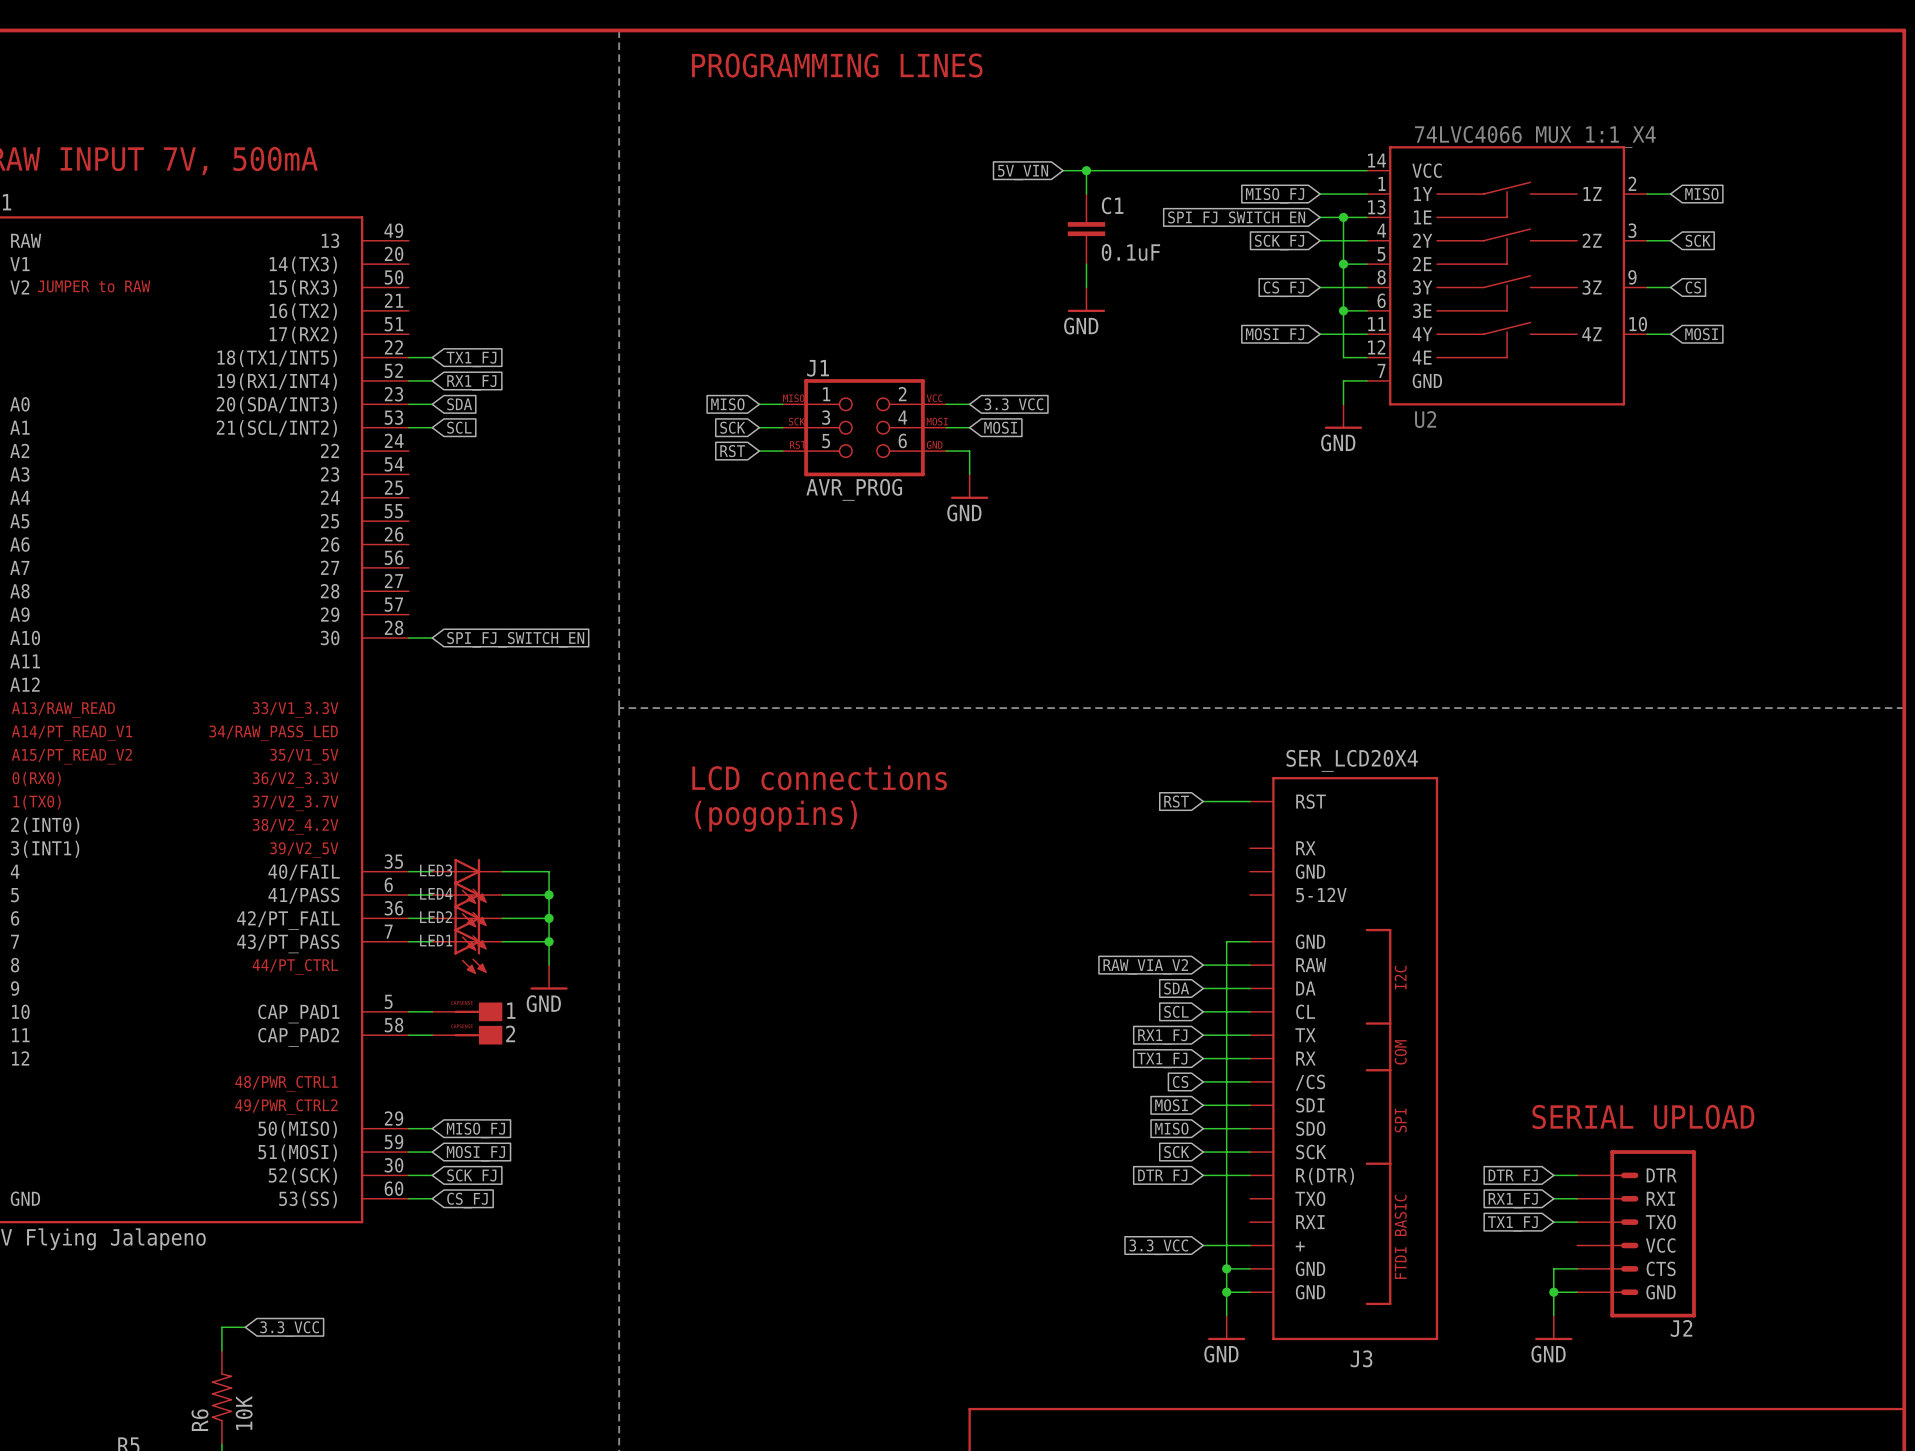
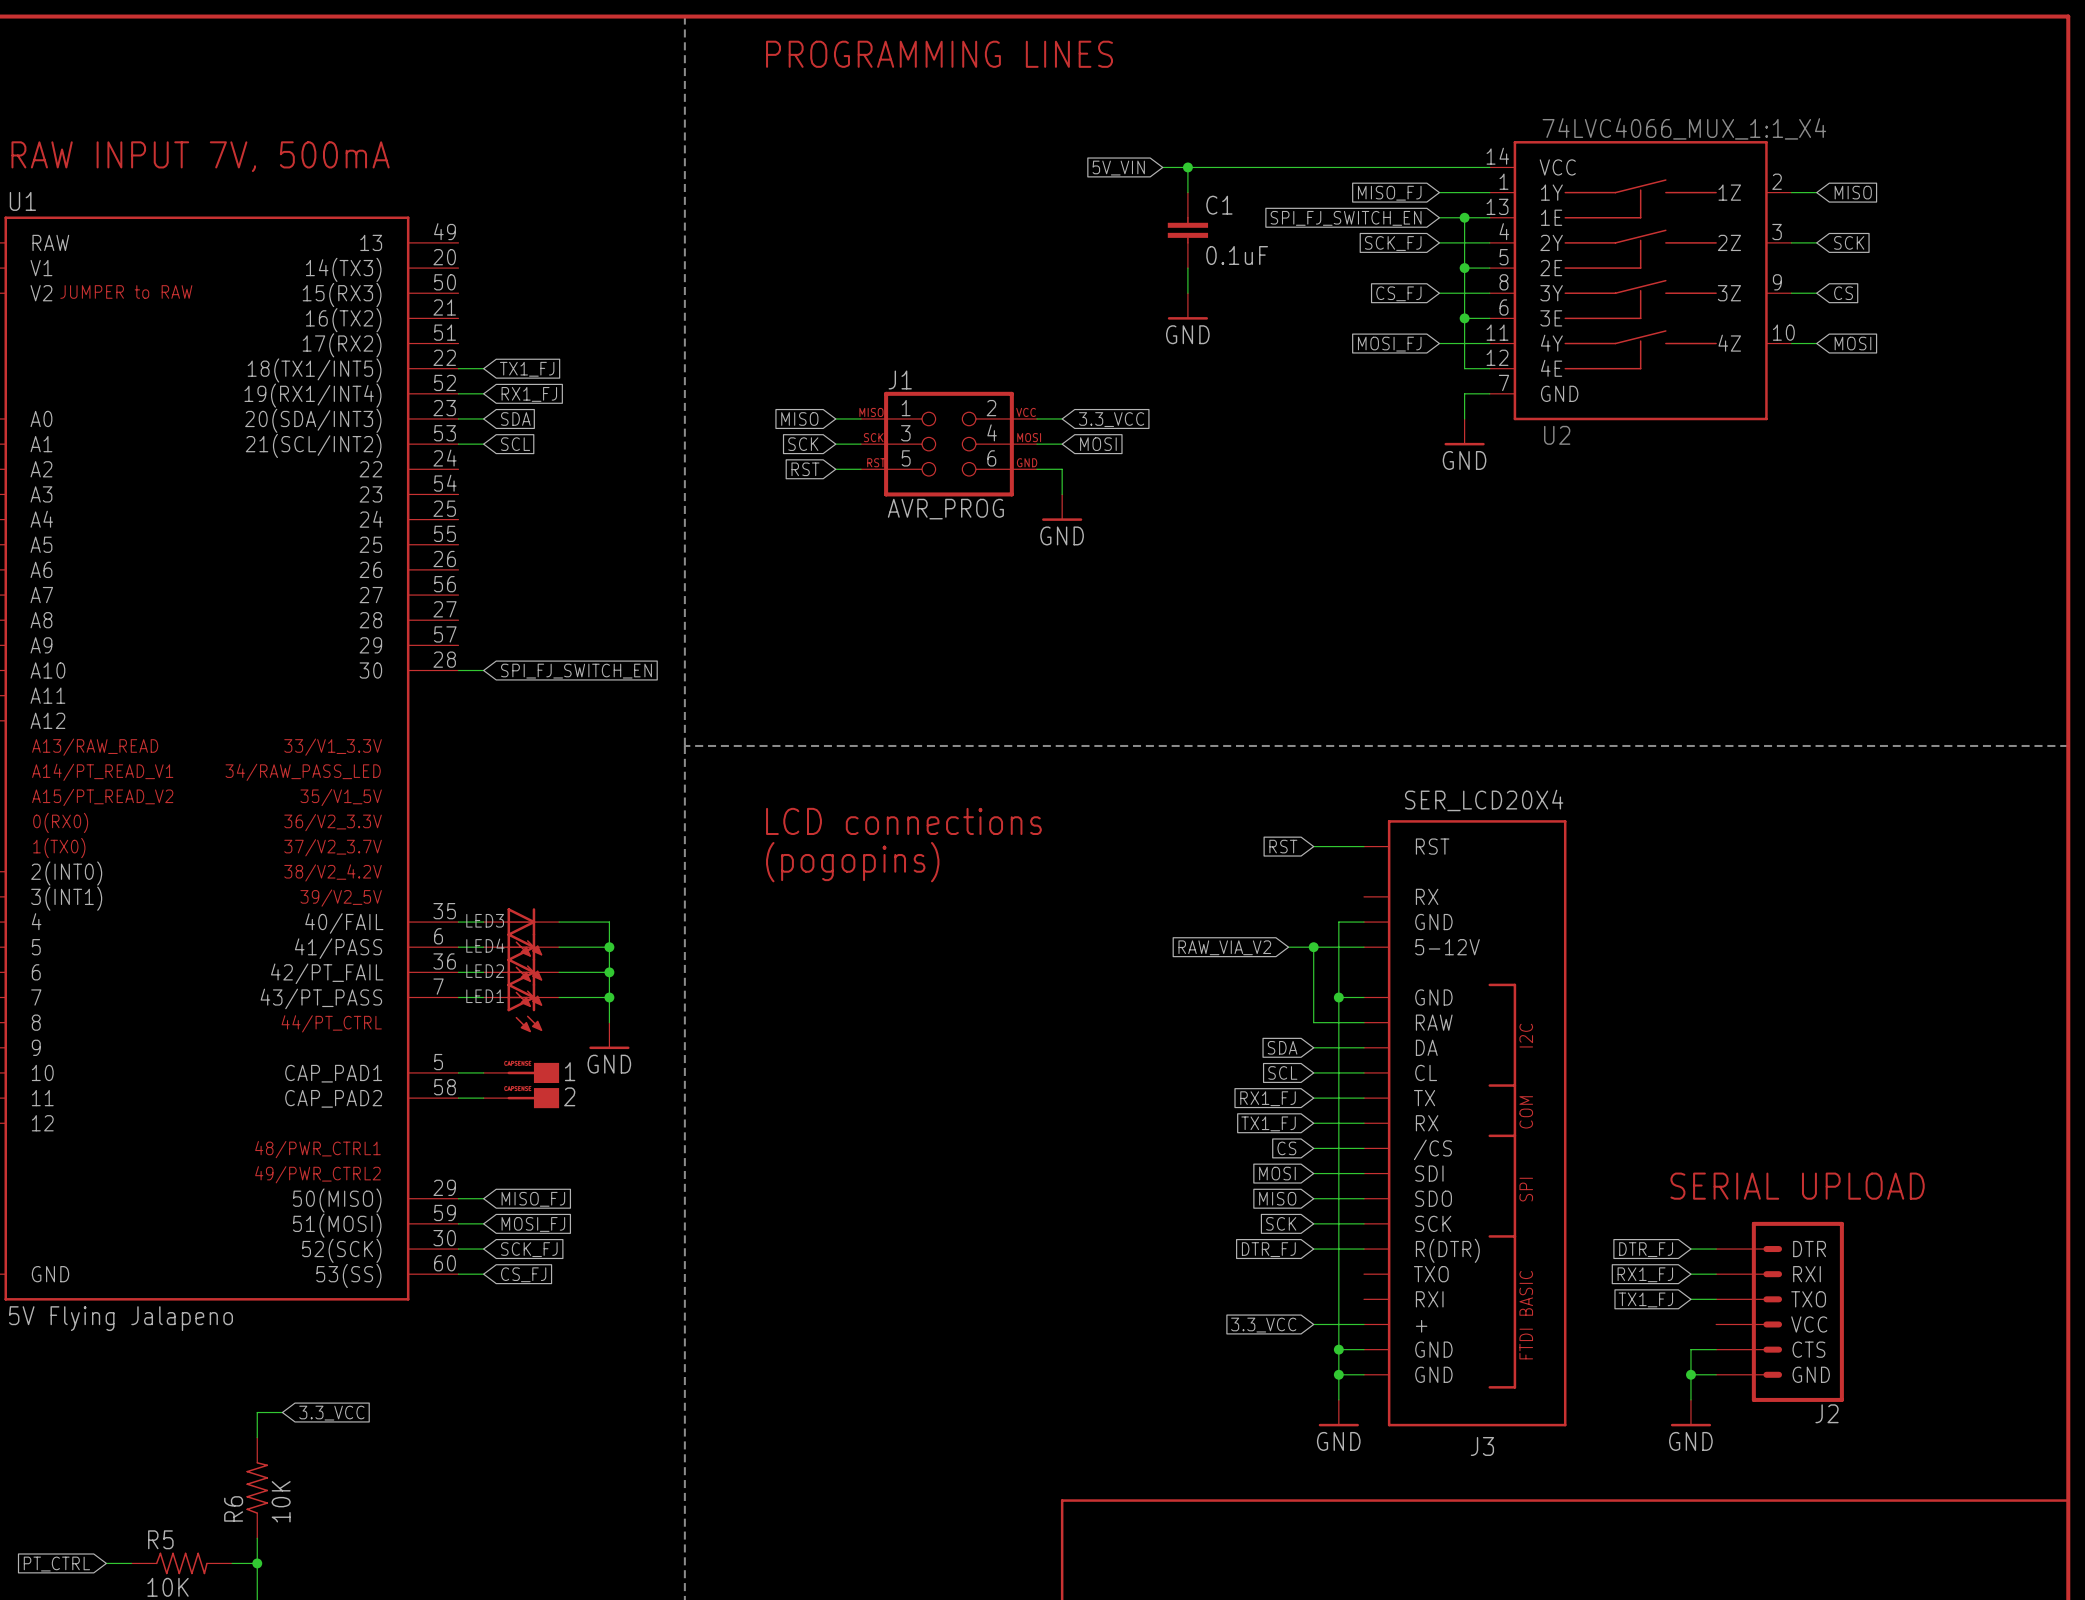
wire: none -> (1363, 922) (1338, 922) (1338, 997)
wire: none -> (1288, 947) (1363, 947)
wire: none -> (1313, 947) (1313, 1022)
junction: none -> (1313, 947)
junction: none -> (1338, 997)
global label position: RAW_VIA_V2 (1145, 966) -> RAW_VIA_V2 (1224, 947)

